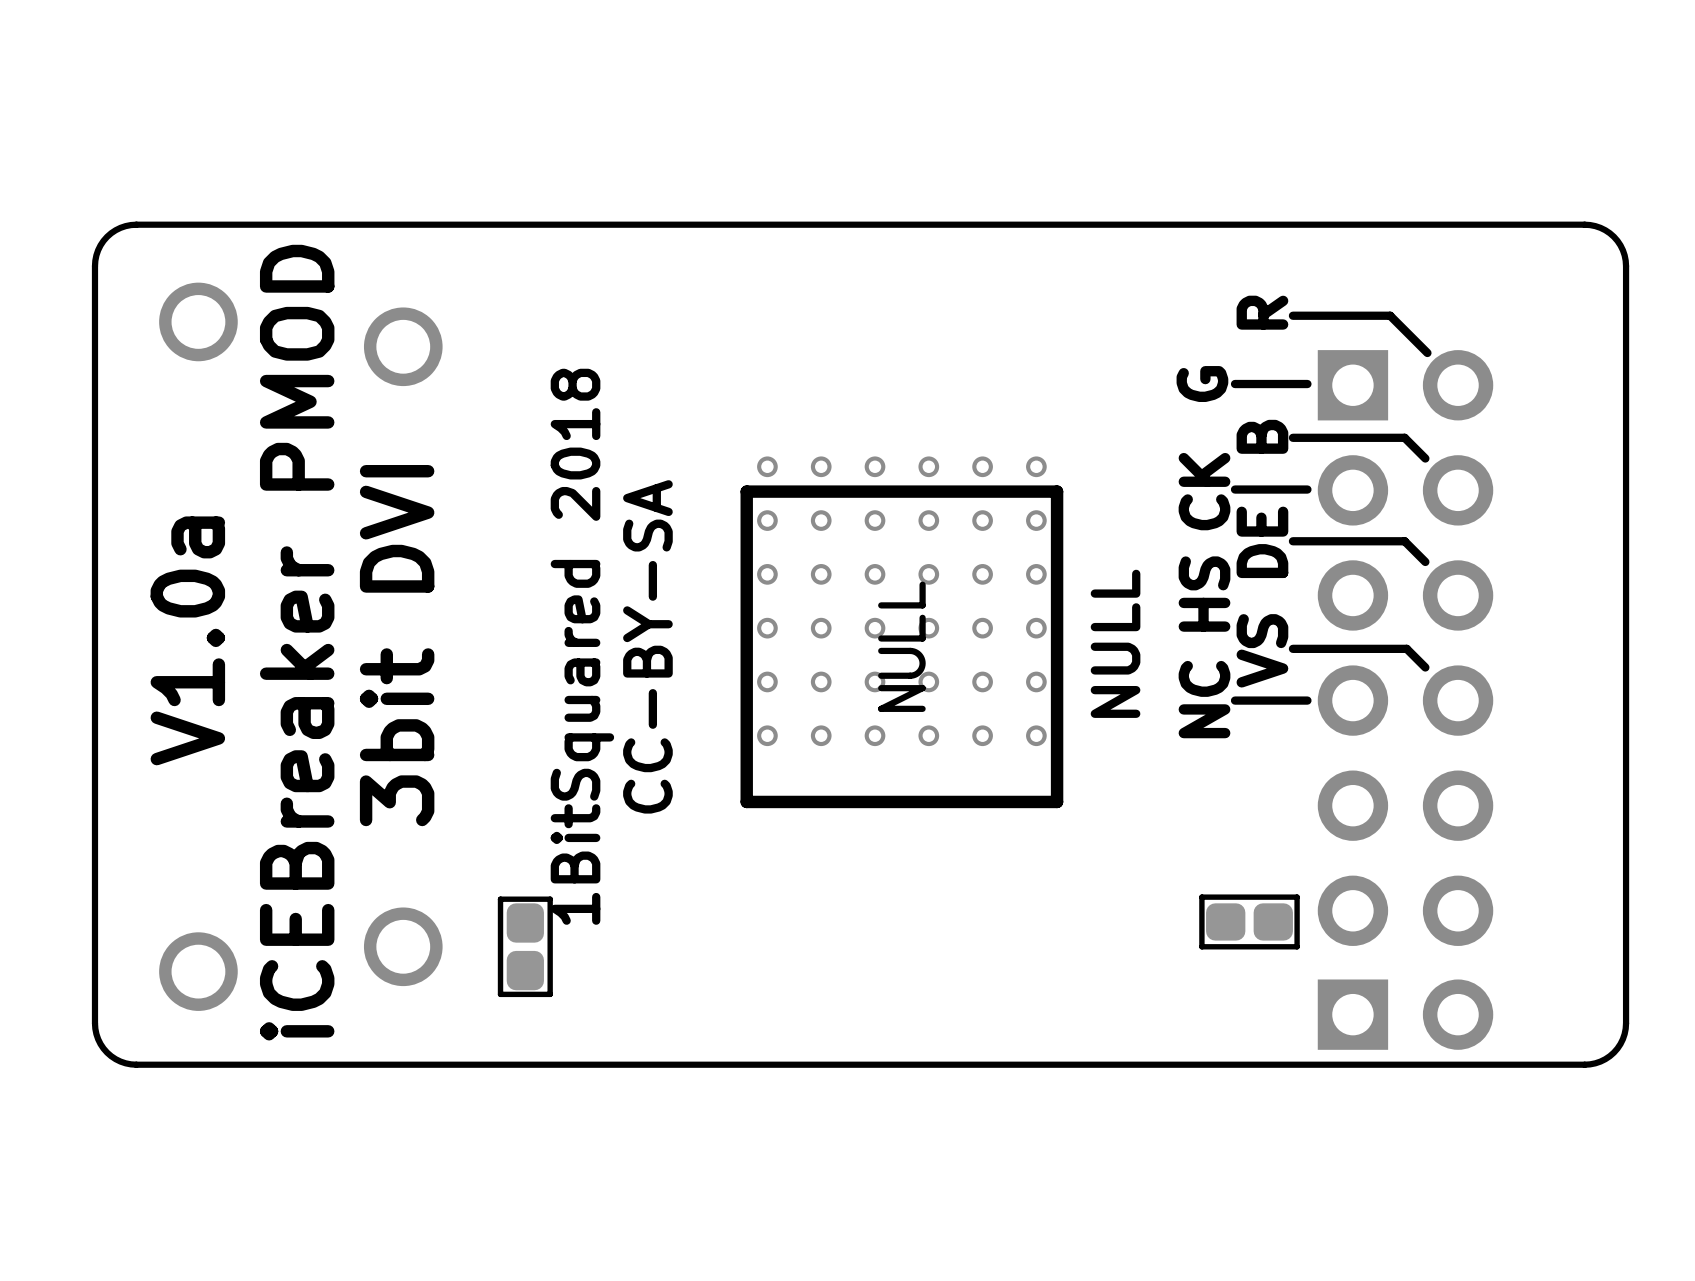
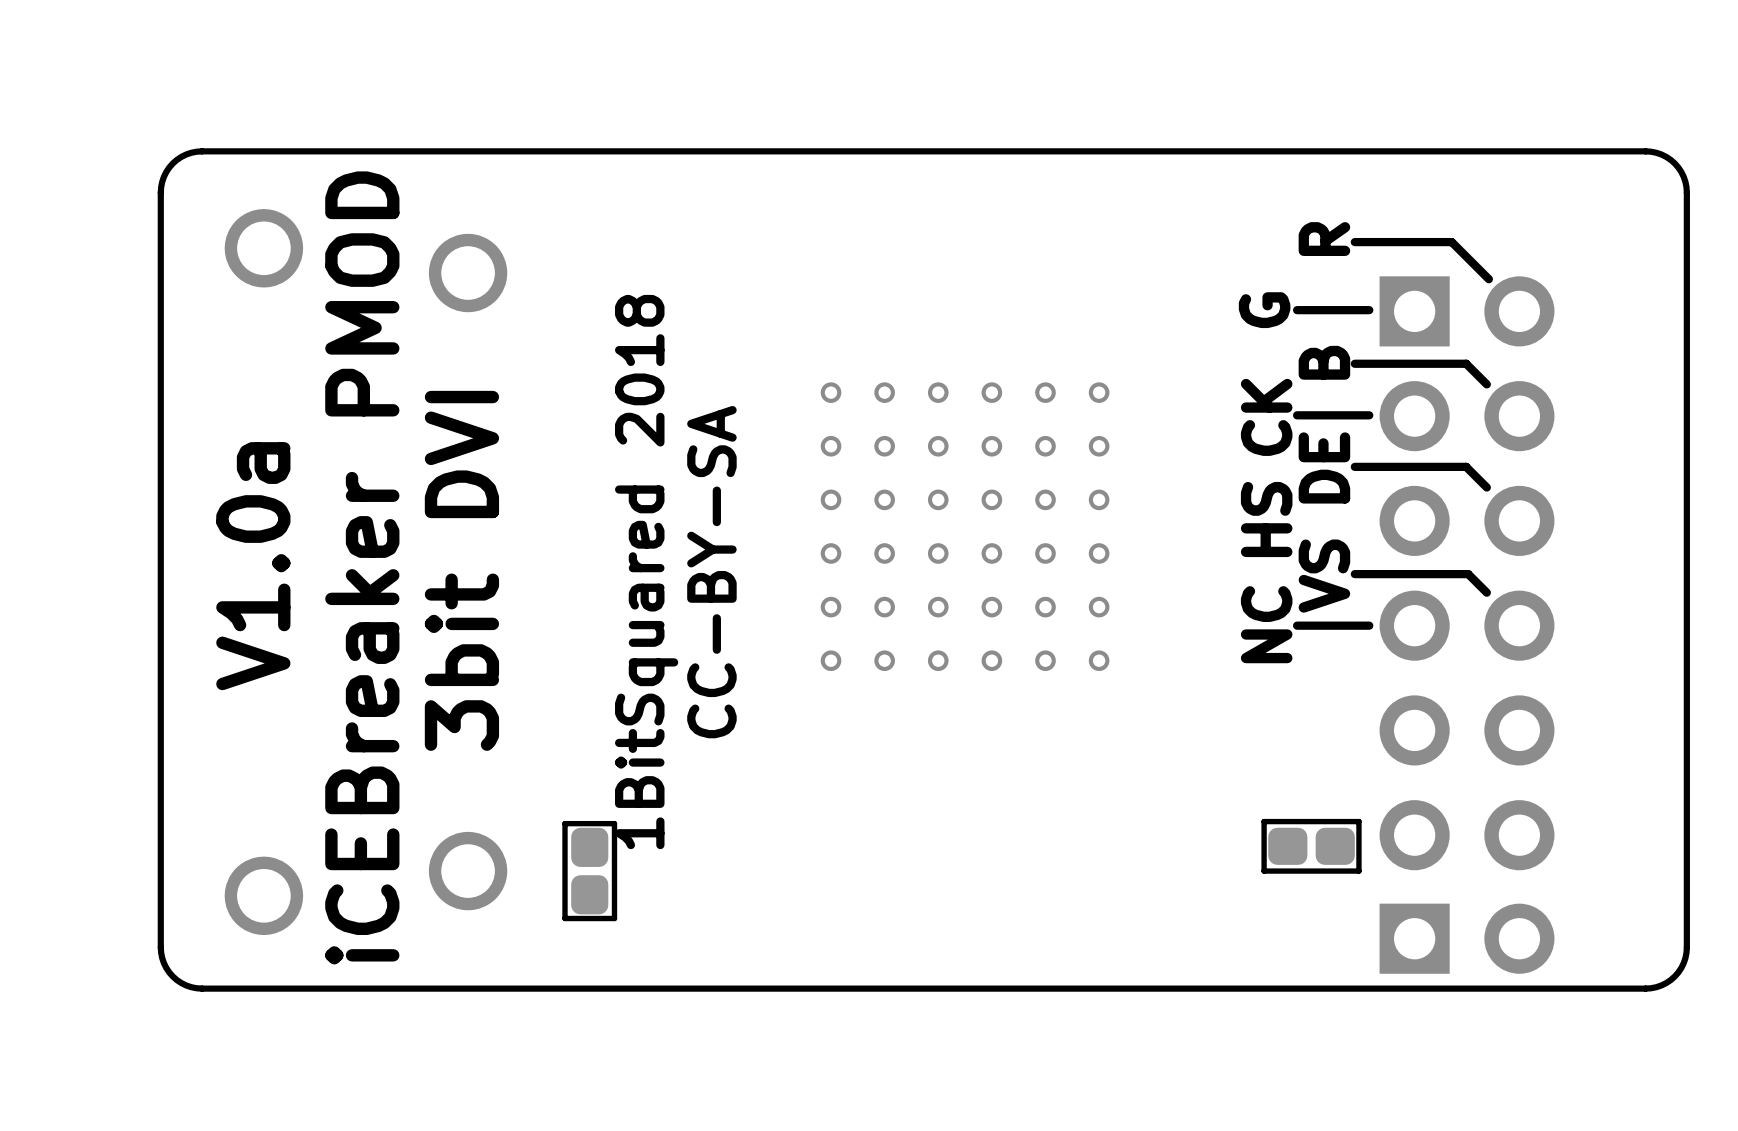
drawing: [740, 485, 1064, 809] -> none
text: NULL (1115, 643) -> none

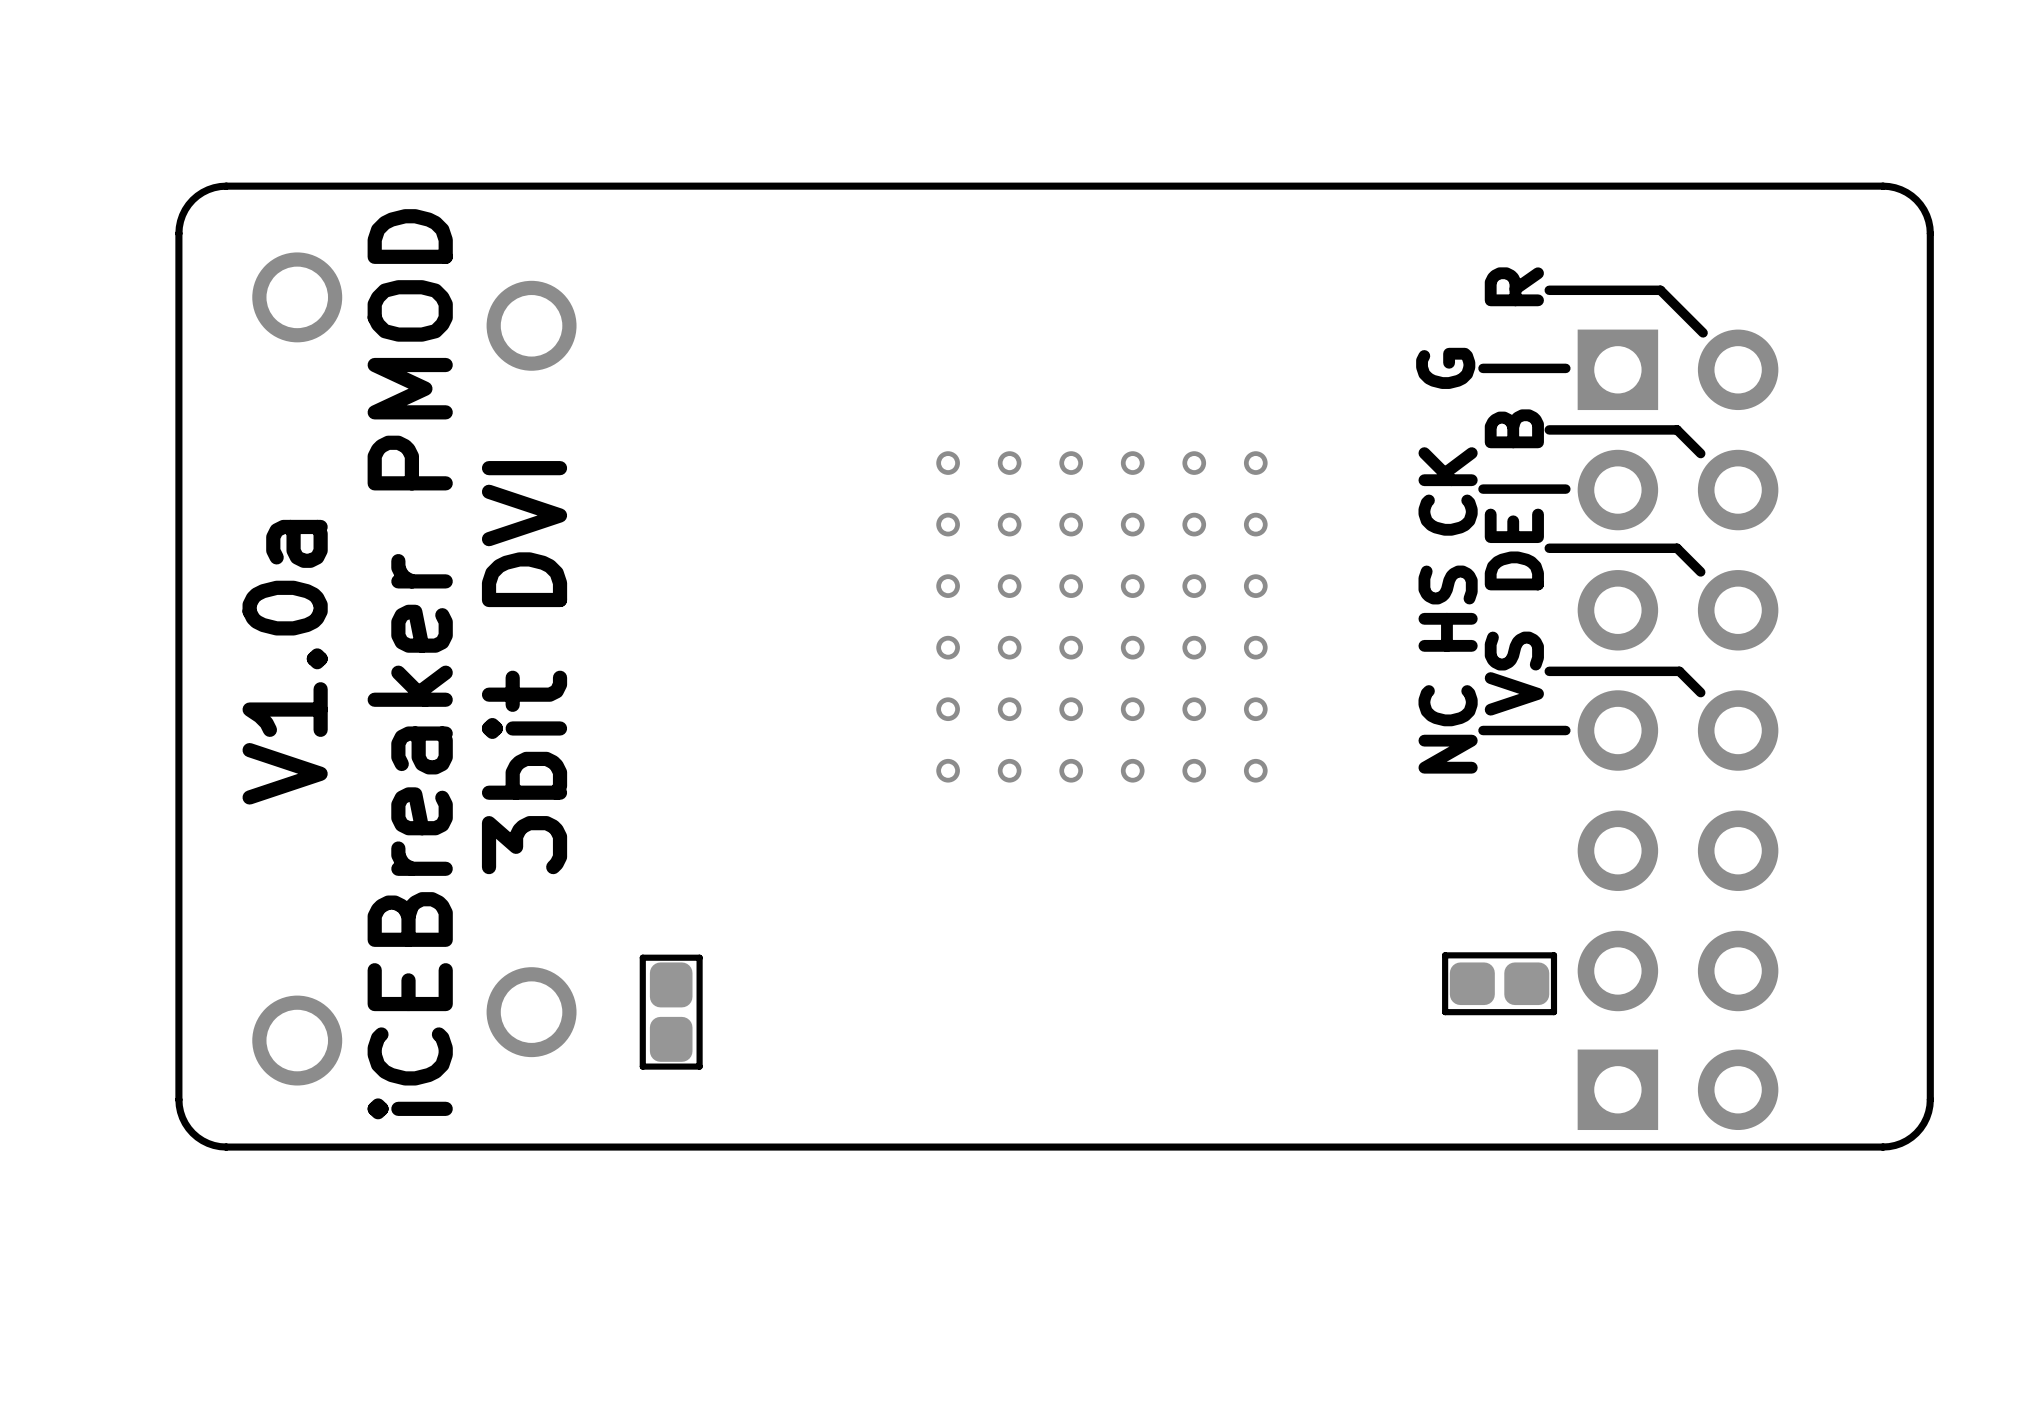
text: 1BitSquared 2018 (646, 572) -> none
text: CC-BY-SA (711, 572) -> none

